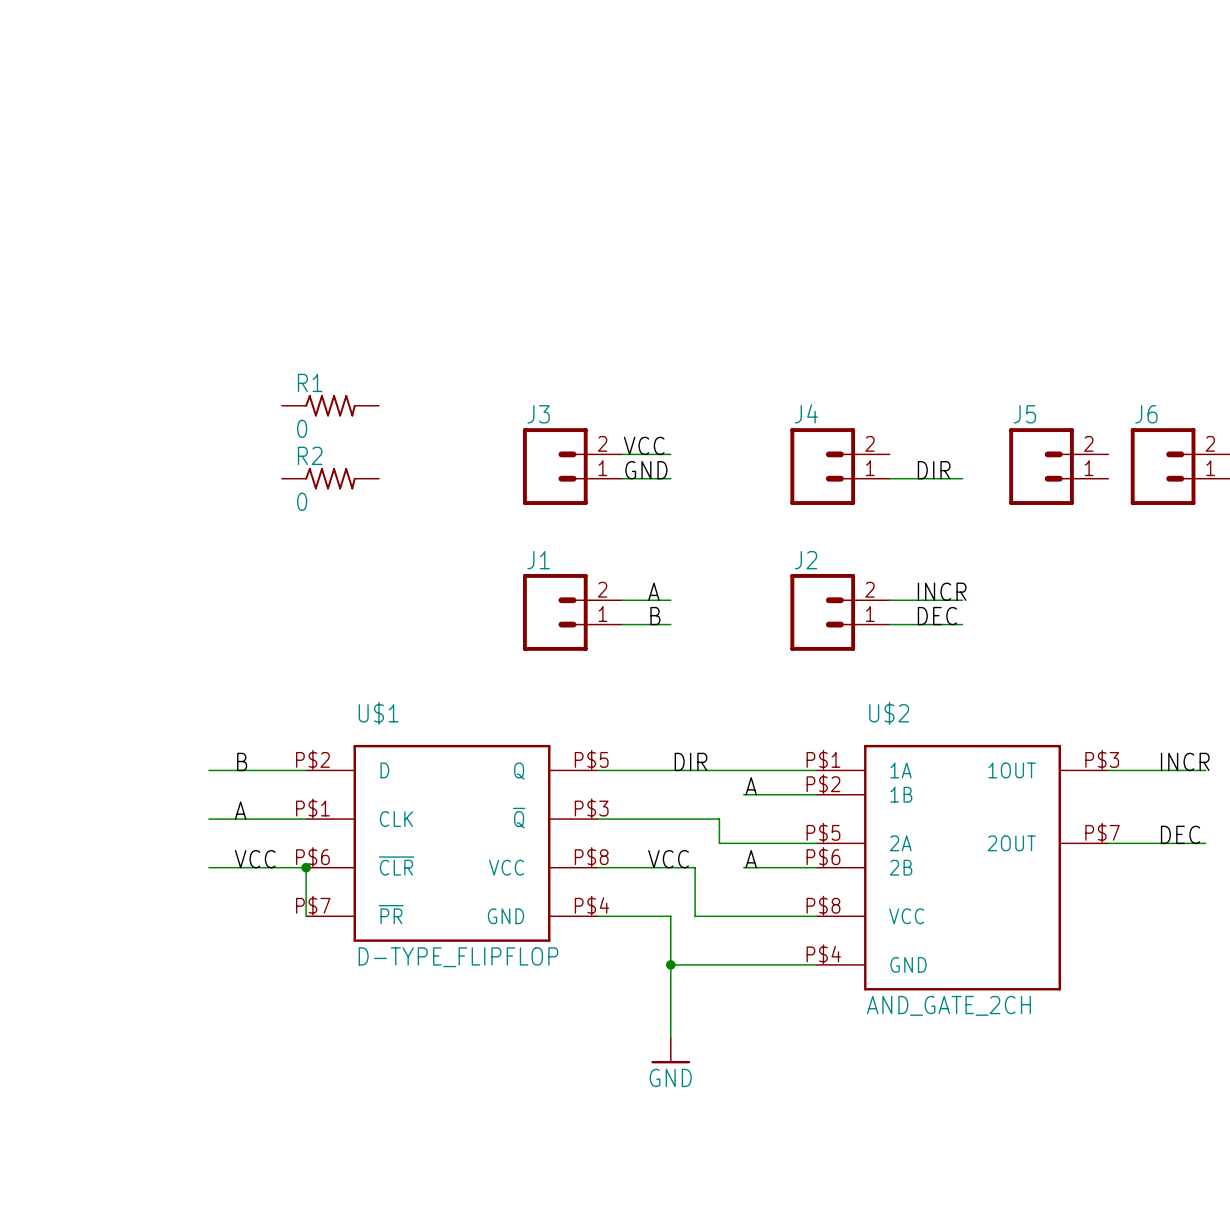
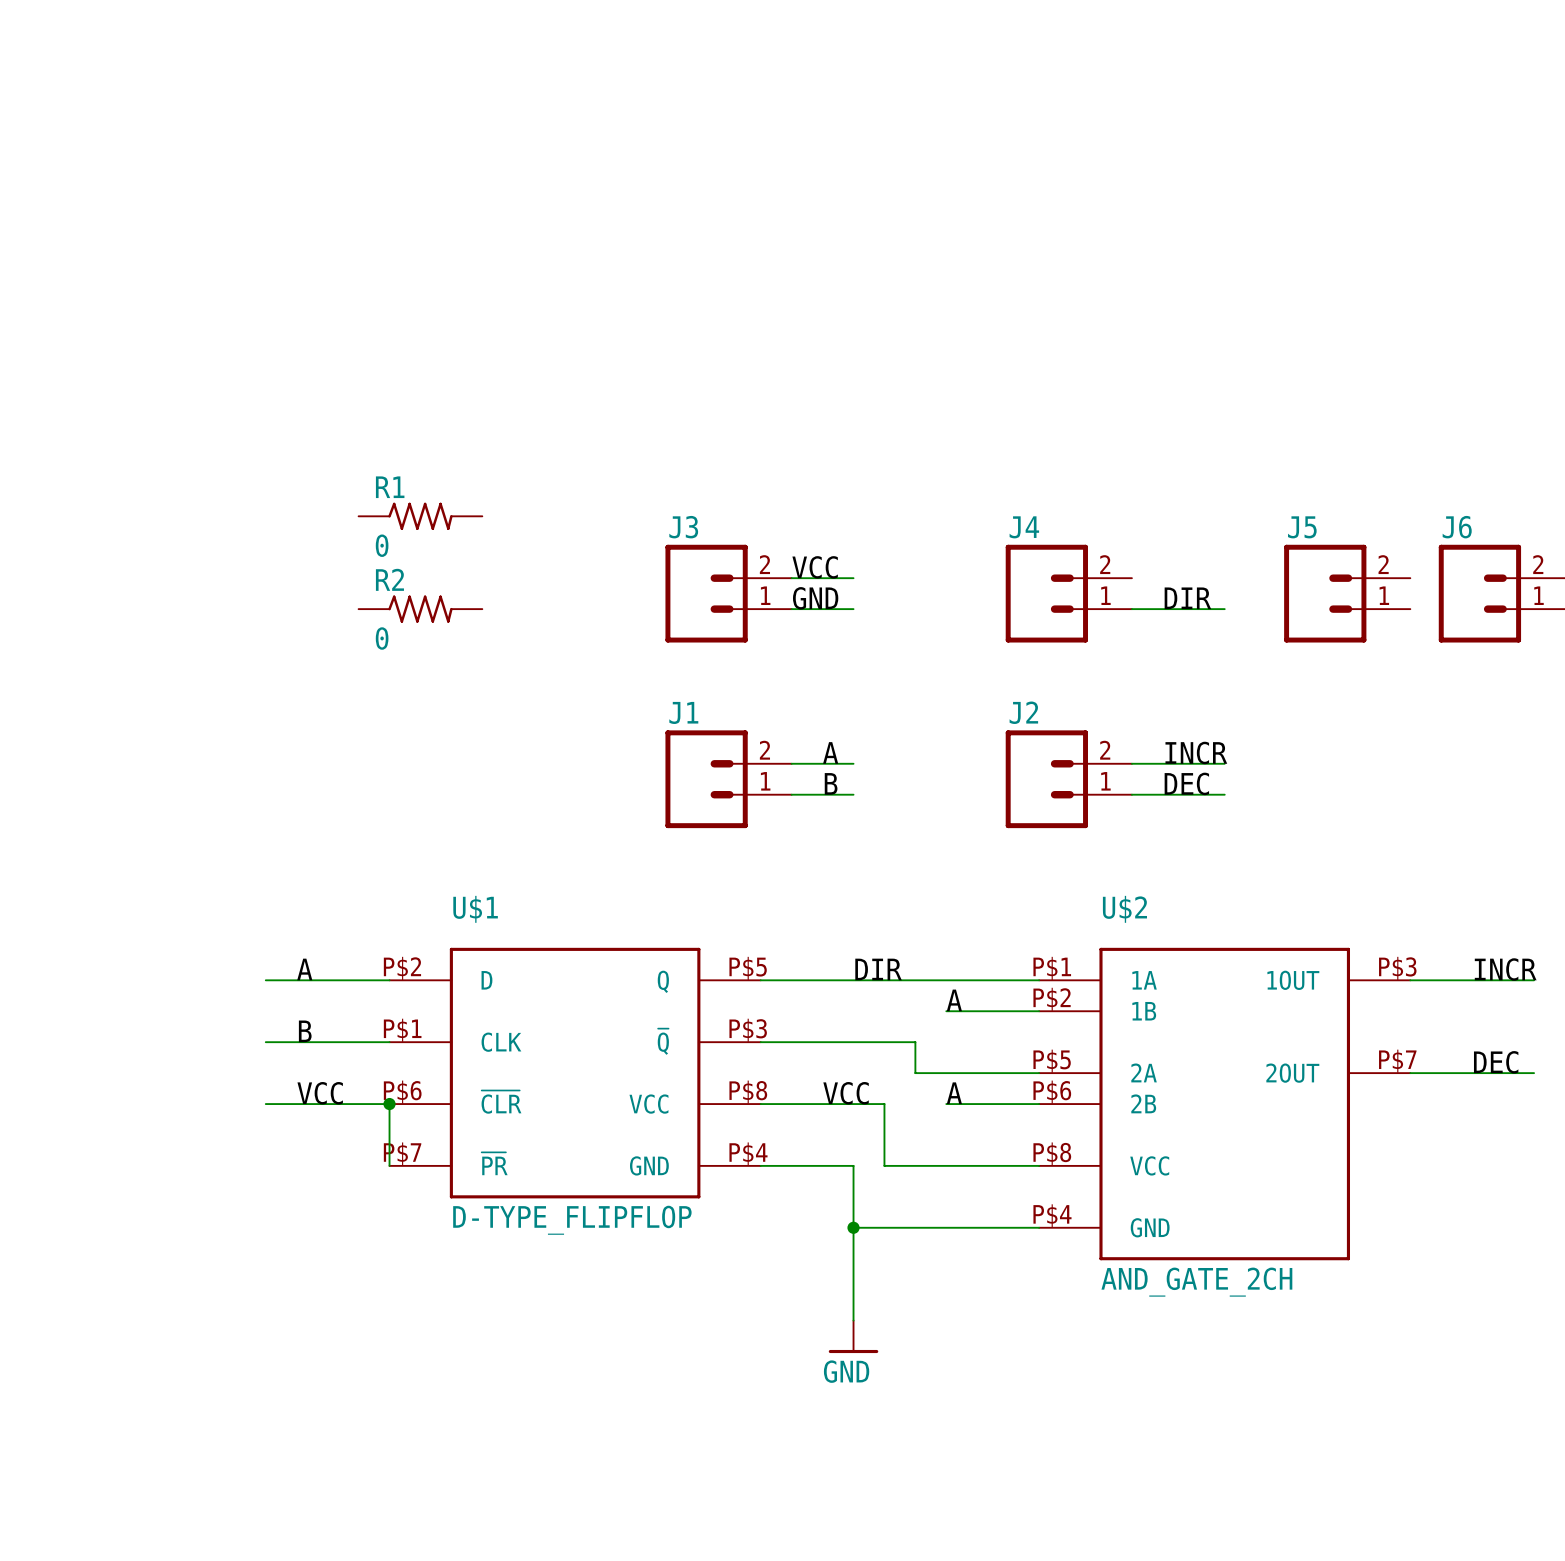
label: B (242, 761) -> A (304, 969)
label: A (240, 810) -> B (305, 1031)

